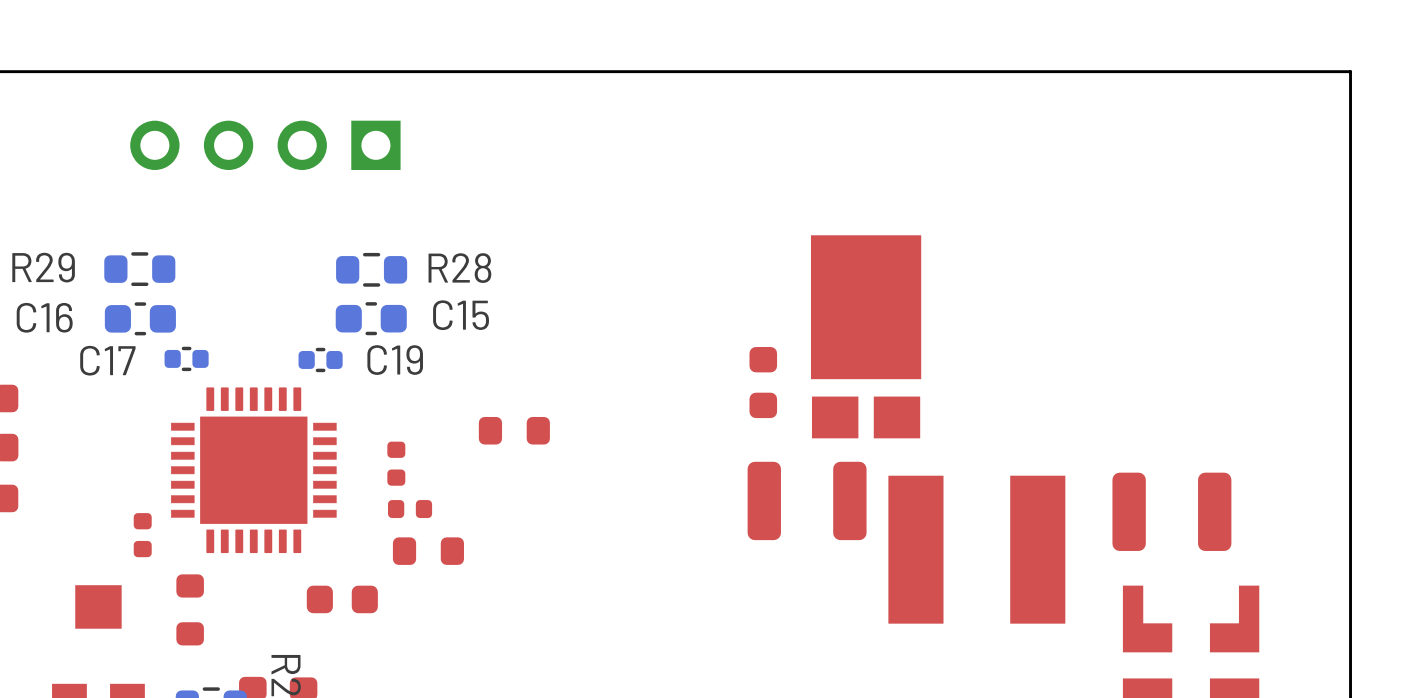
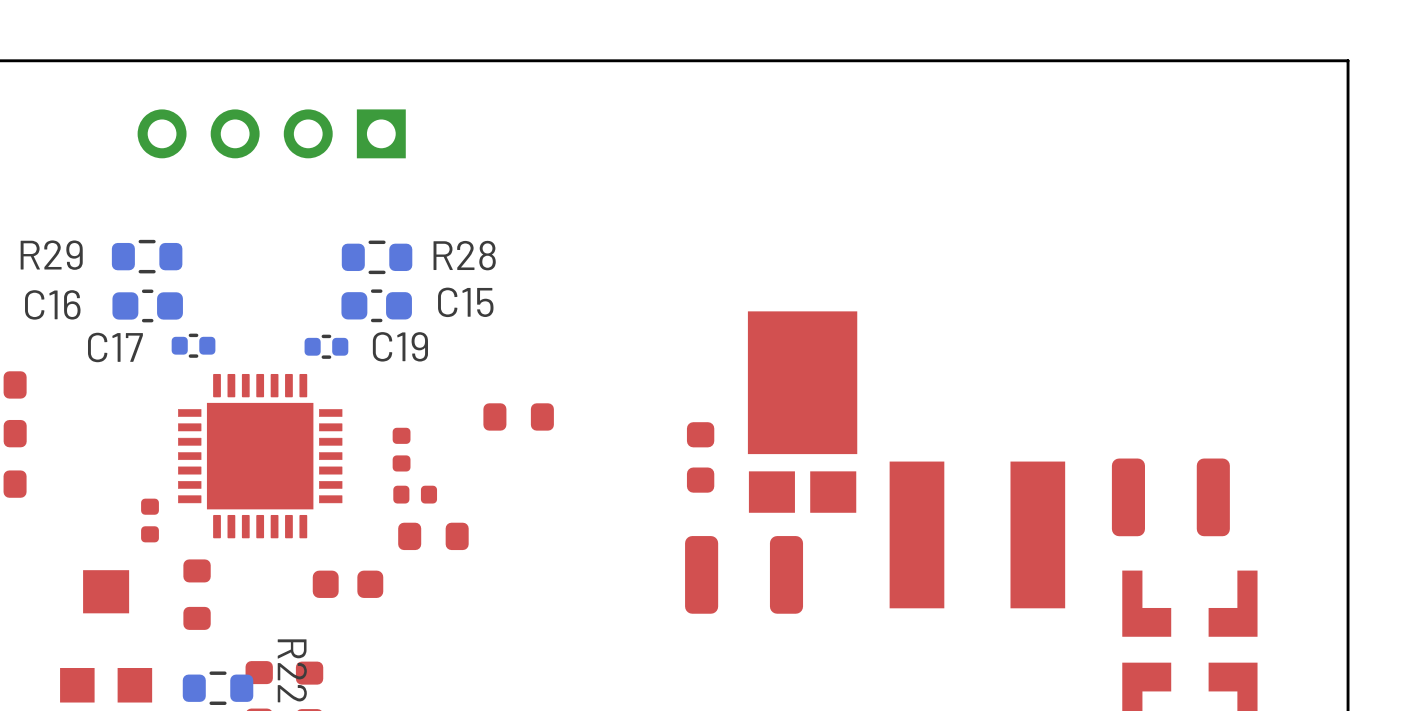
part position: (866, 336) -> (802, 412)
part position: (763, 382) -> (700, 457)
part position: (807, 500) -> (744, 574)

